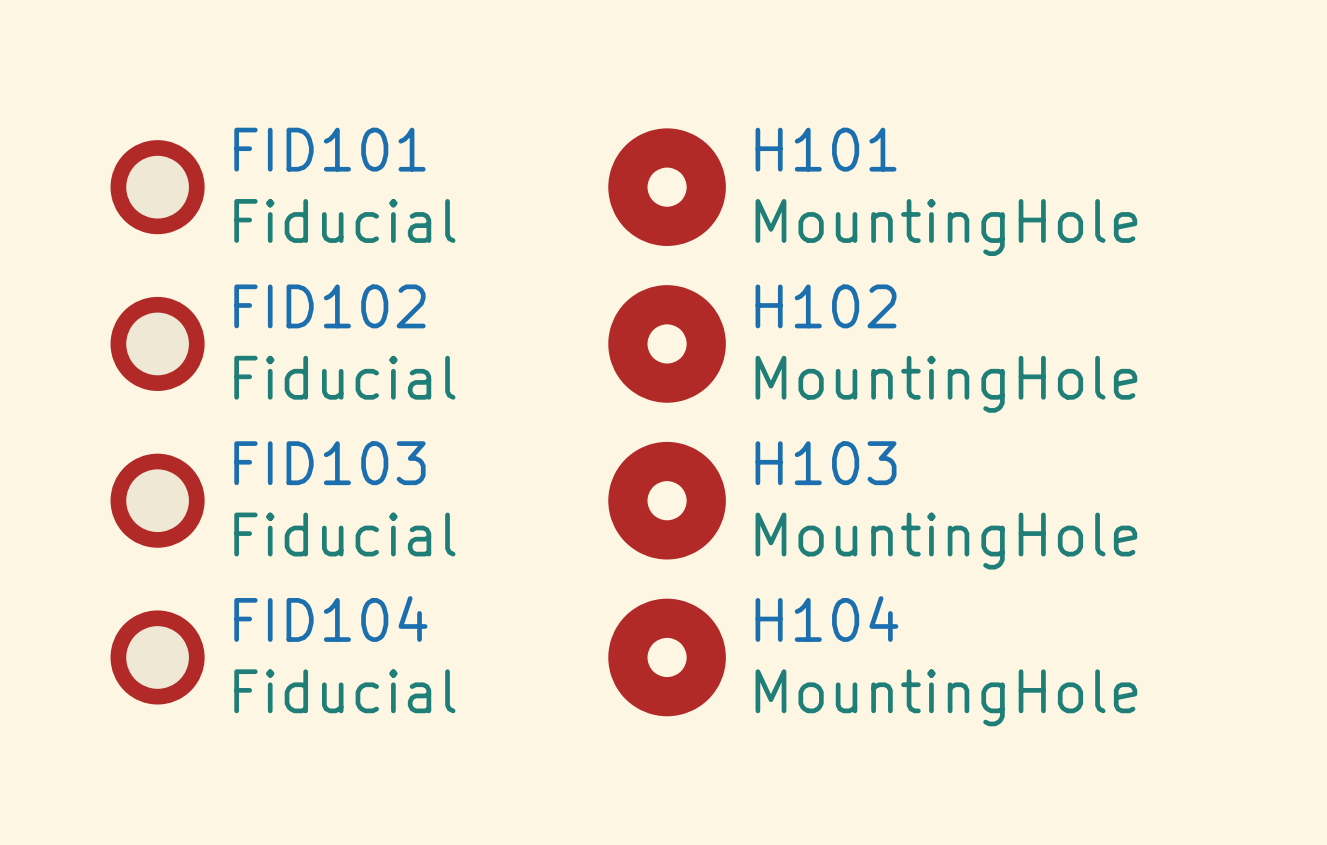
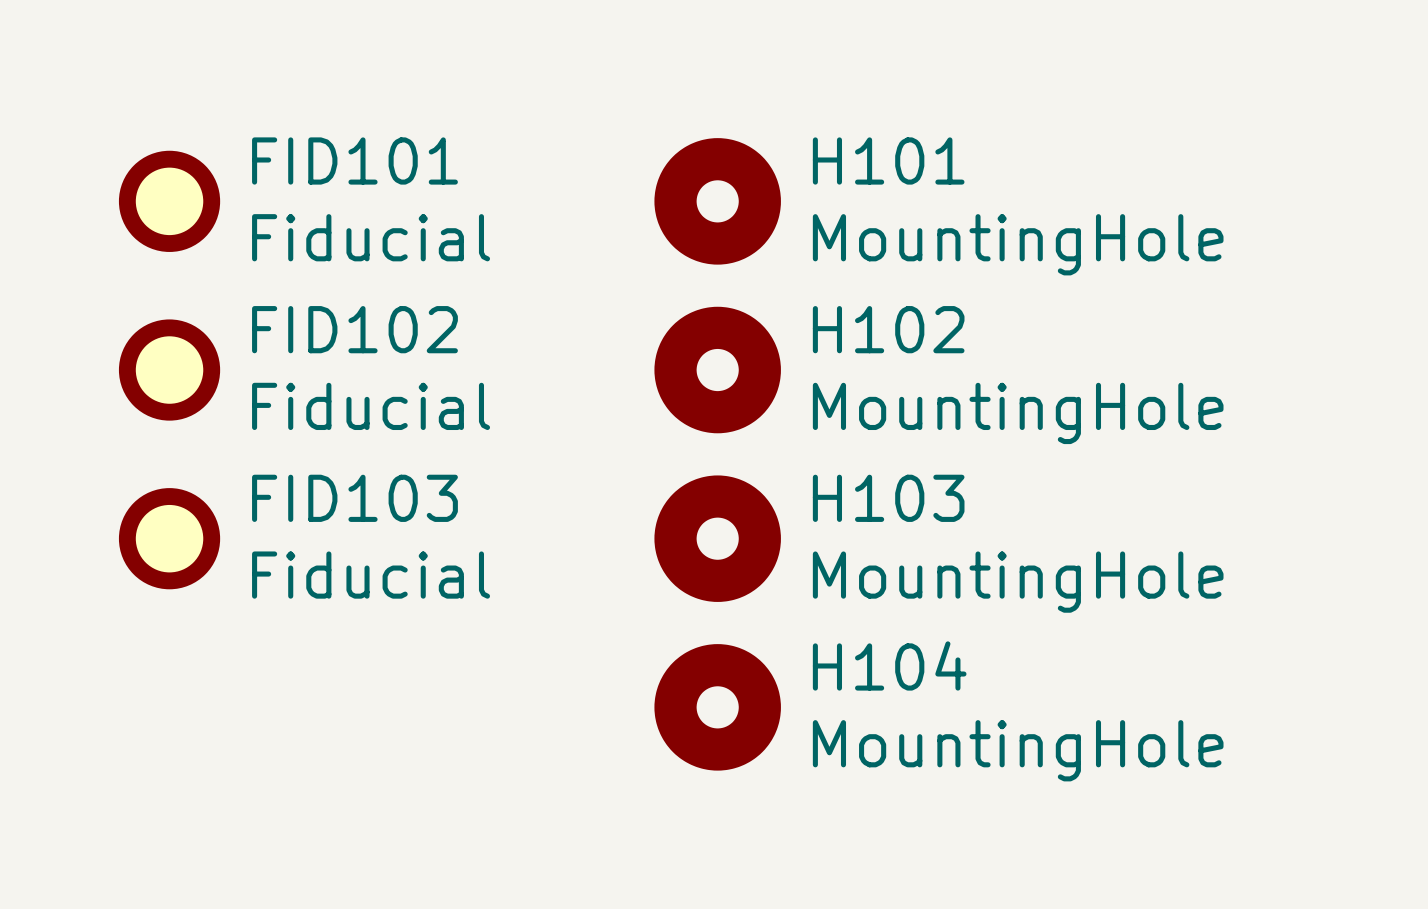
FID104: Fiducial (157, 657) -> none

